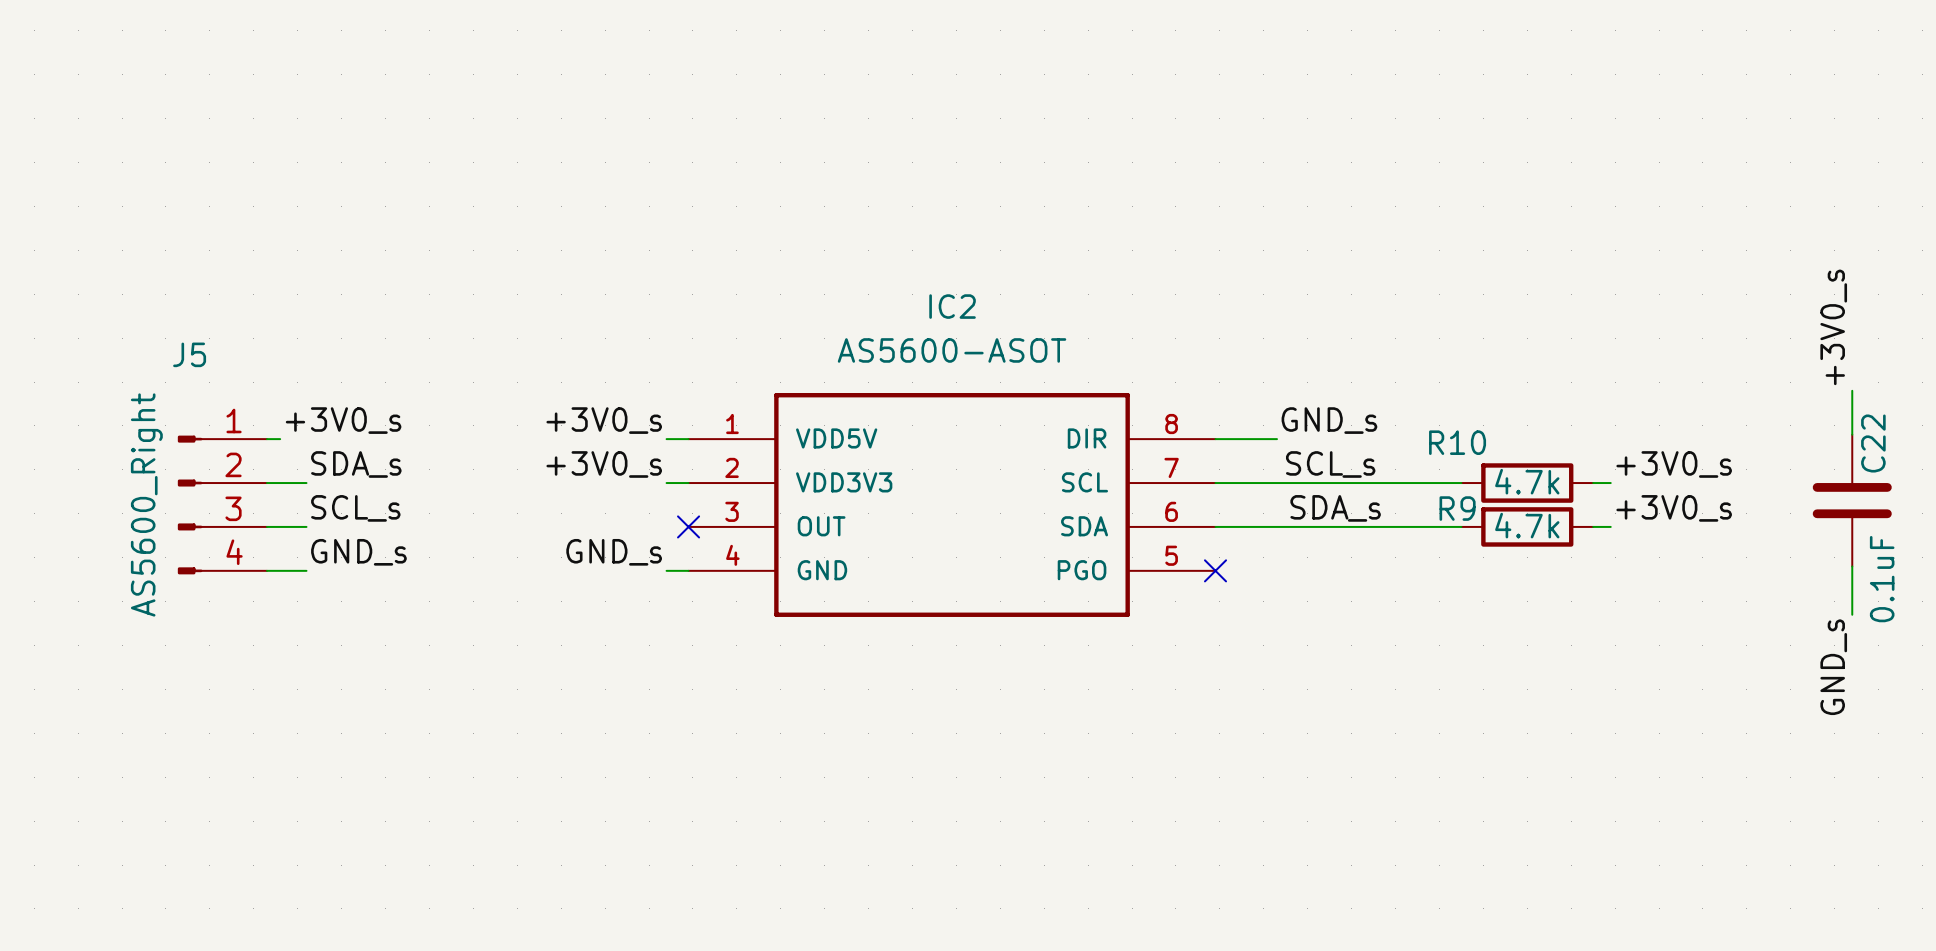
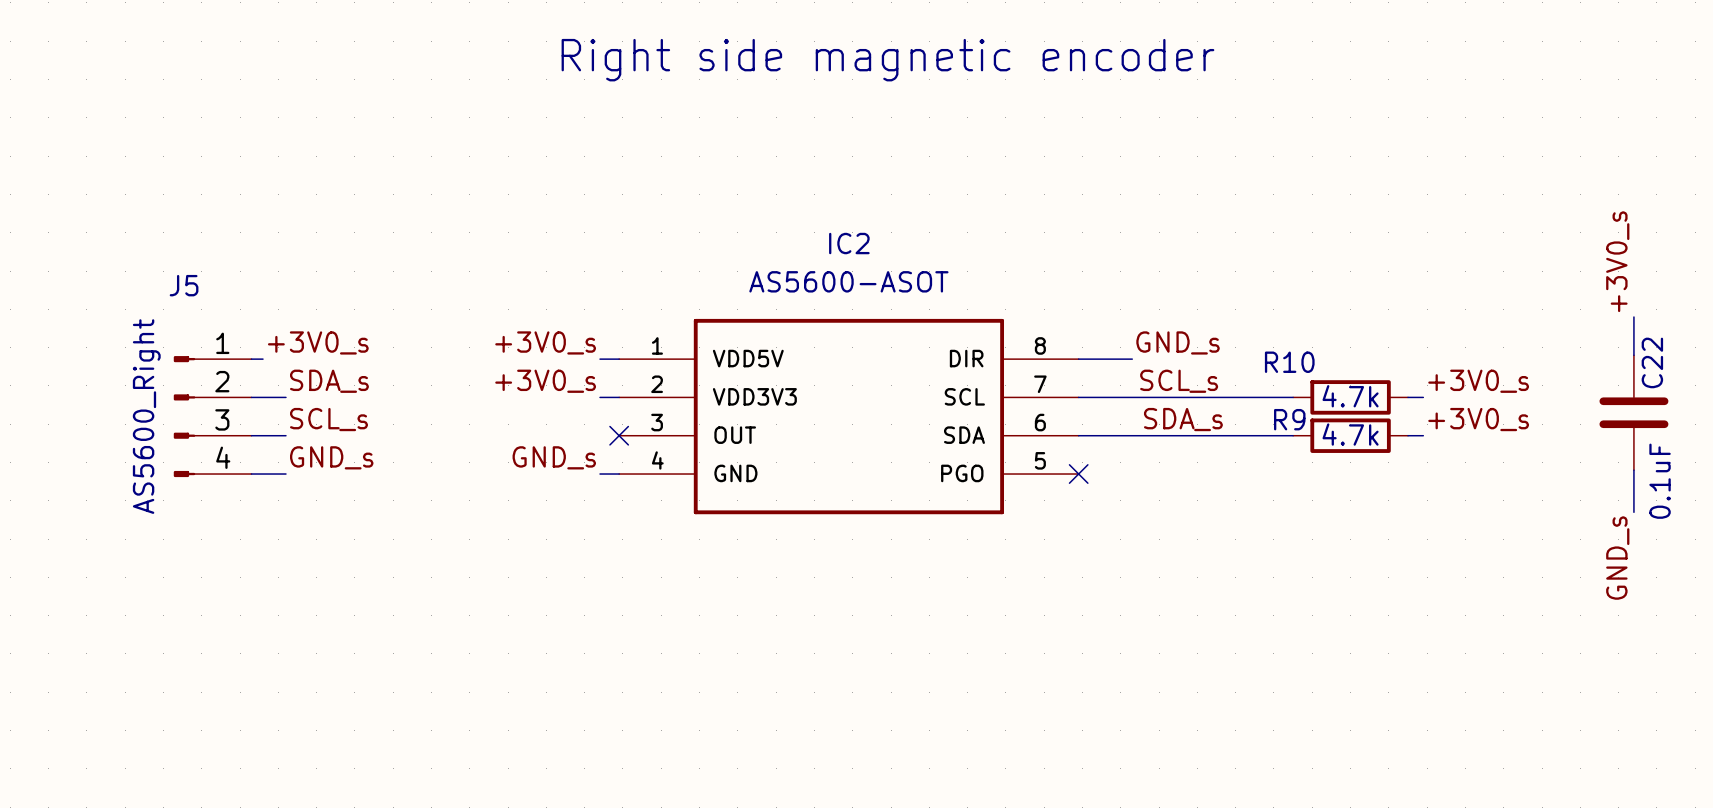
text: none -> Right side magnetic encoder (887, 60)

